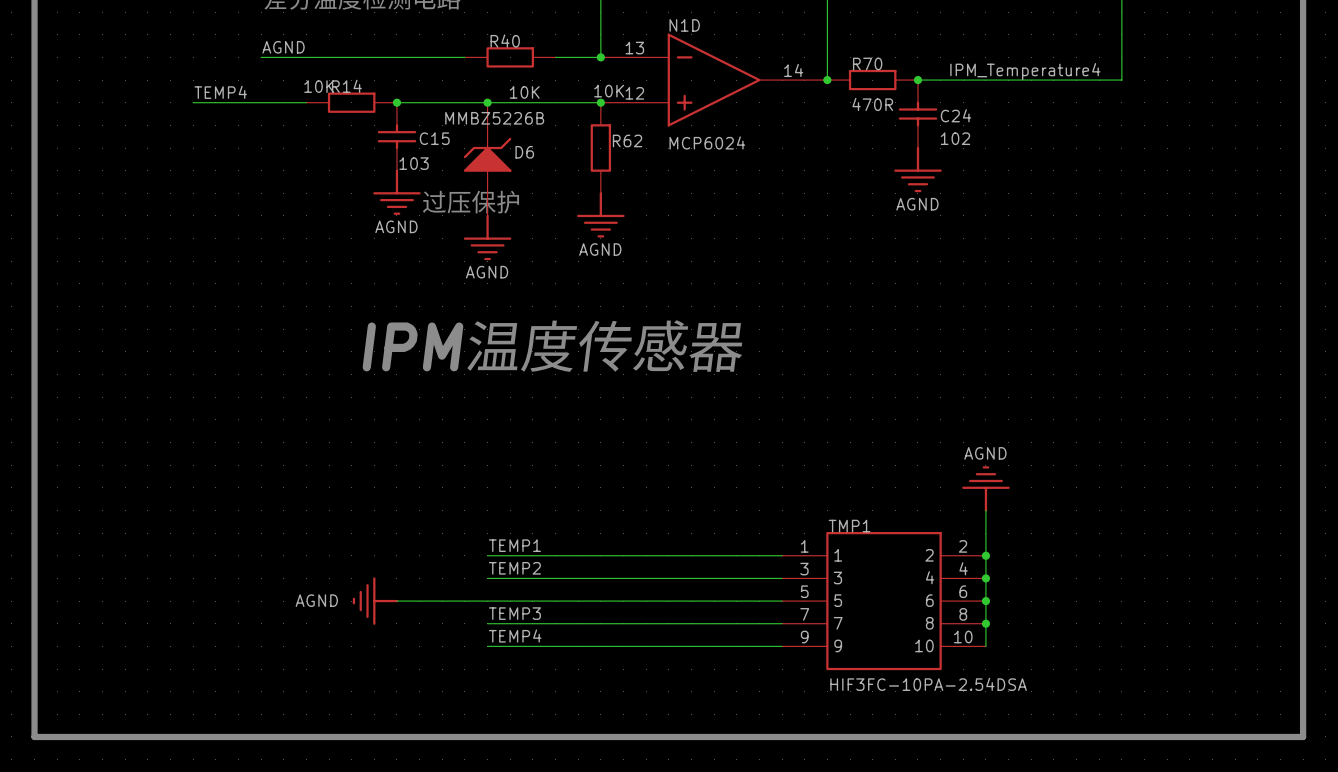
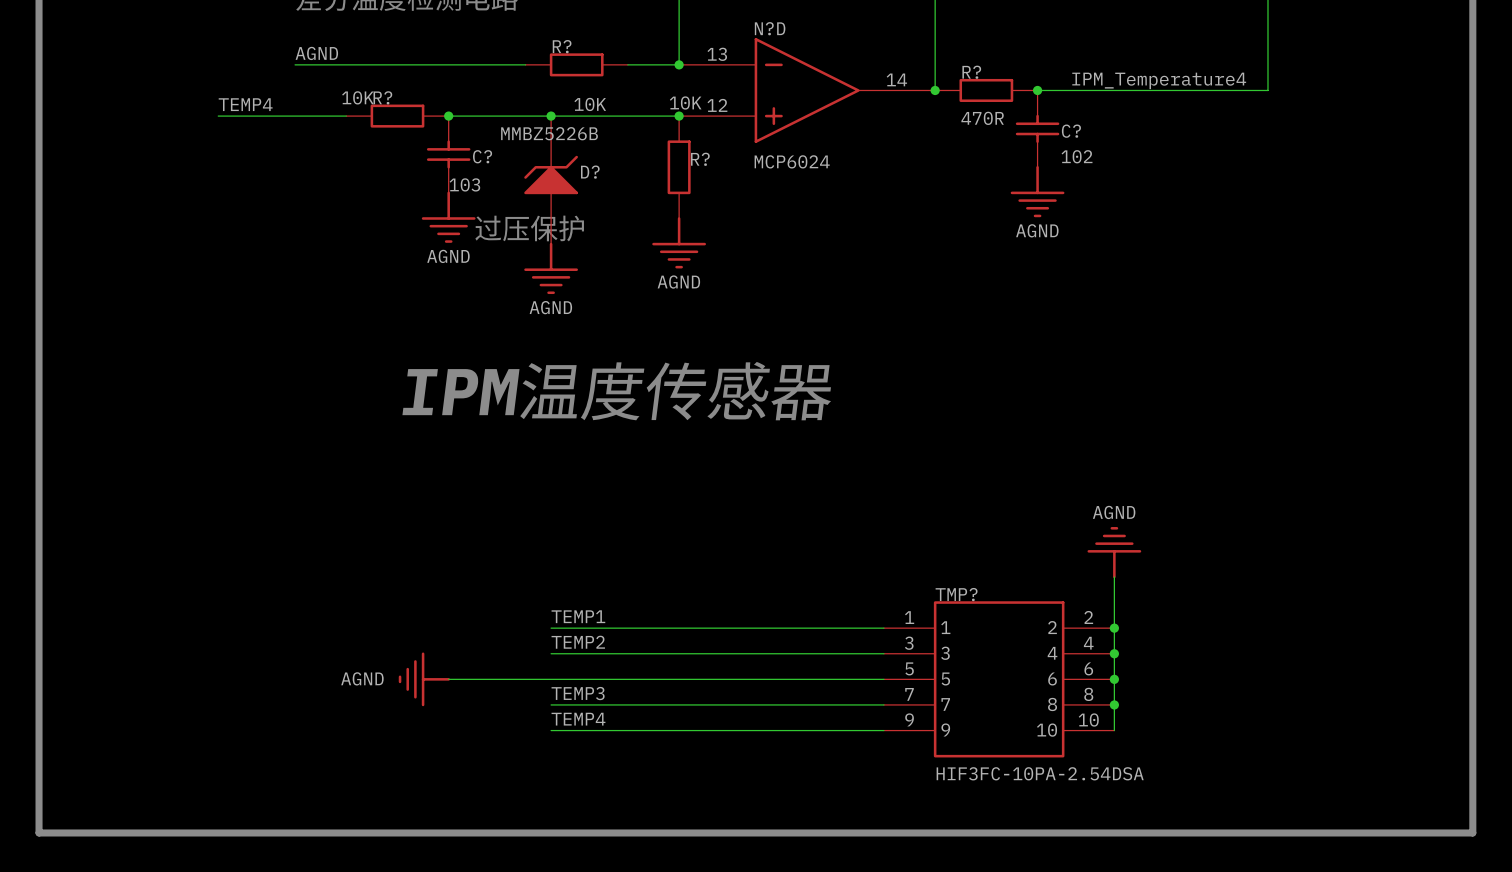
N1D name: N1D (684, 25) -> N?D (770, 28)
R40 name: R40 (505, 41) -> R? (562, 46)
R70 name: R70 (867, 63) -> R? (971, 72)
R14 name: R14 (346, 86) -> R? (382, 97)
C24 name: C24 (955, 115) -> C? (1071, 131)
C15 name: C15 (434, 138) -> C? (482, 156)
R62 name: R62 (627, 140) -> R? (700, 159)
D6 name: D6 (524, 152) -> D? (590, 172)
TMP1 name: TMP1 (849, 526) -> TMP? (956, 594)

